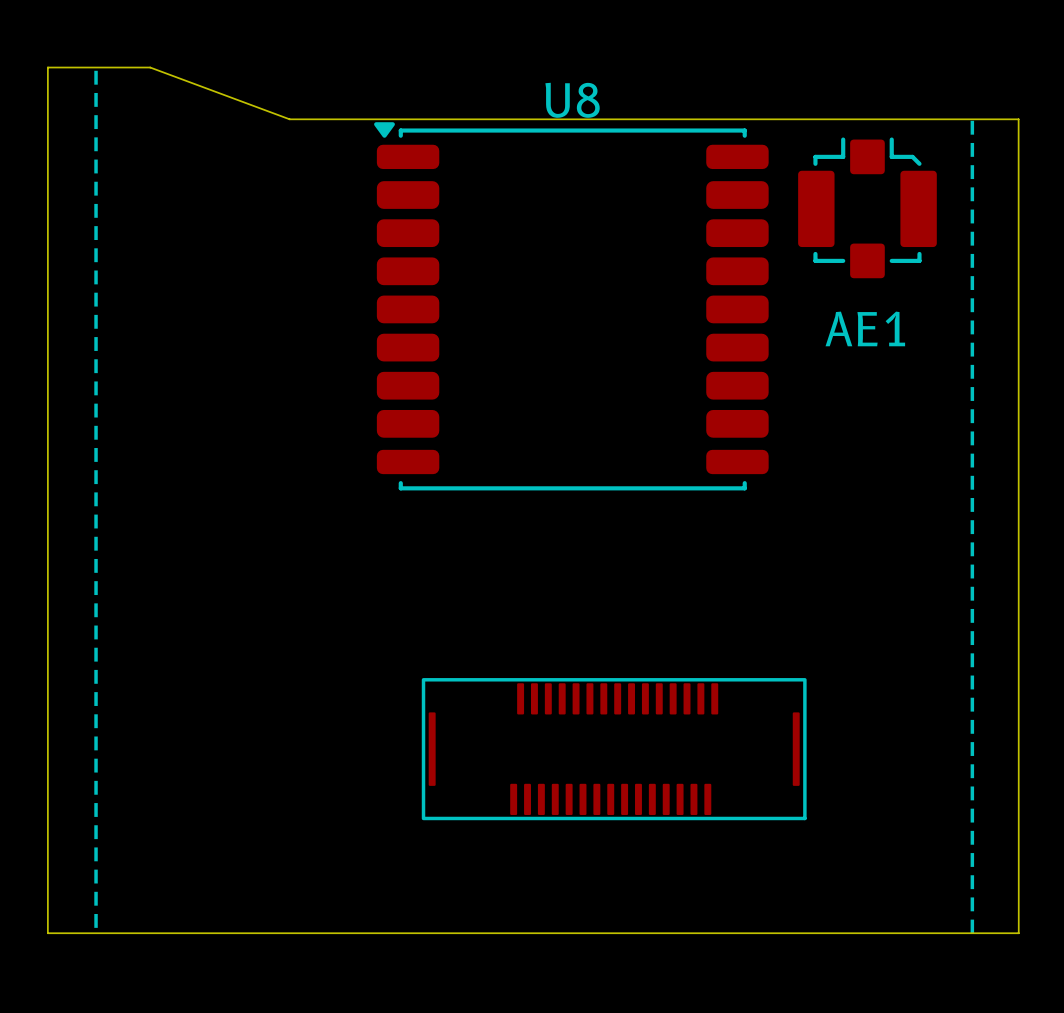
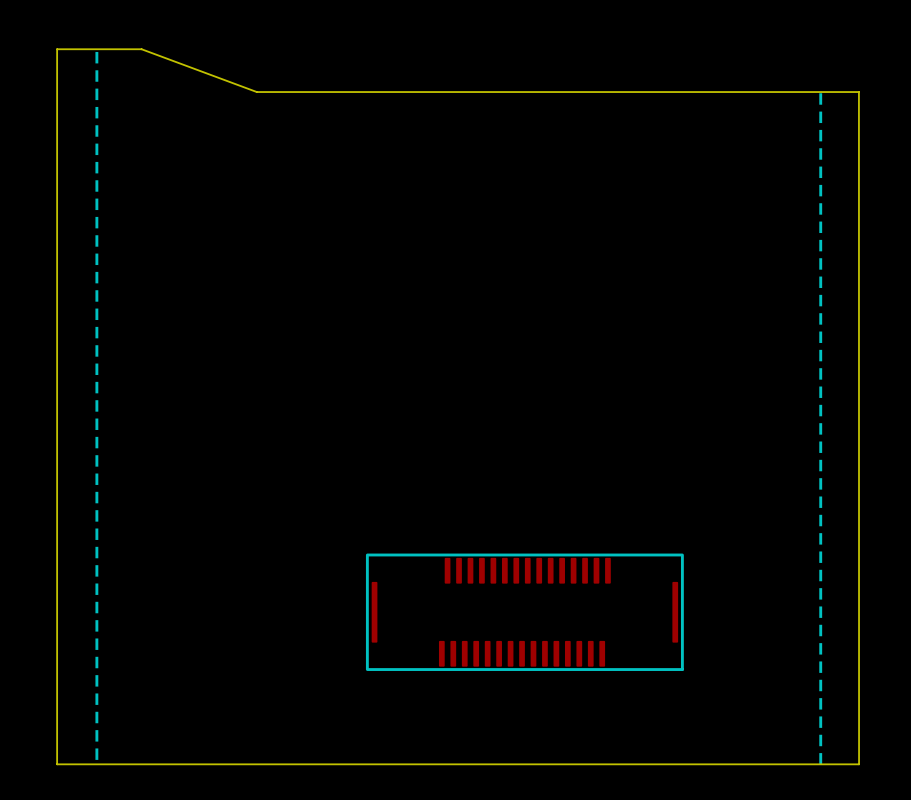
AE1: (867, 207) -> none
U8: (571, 306) -> none

